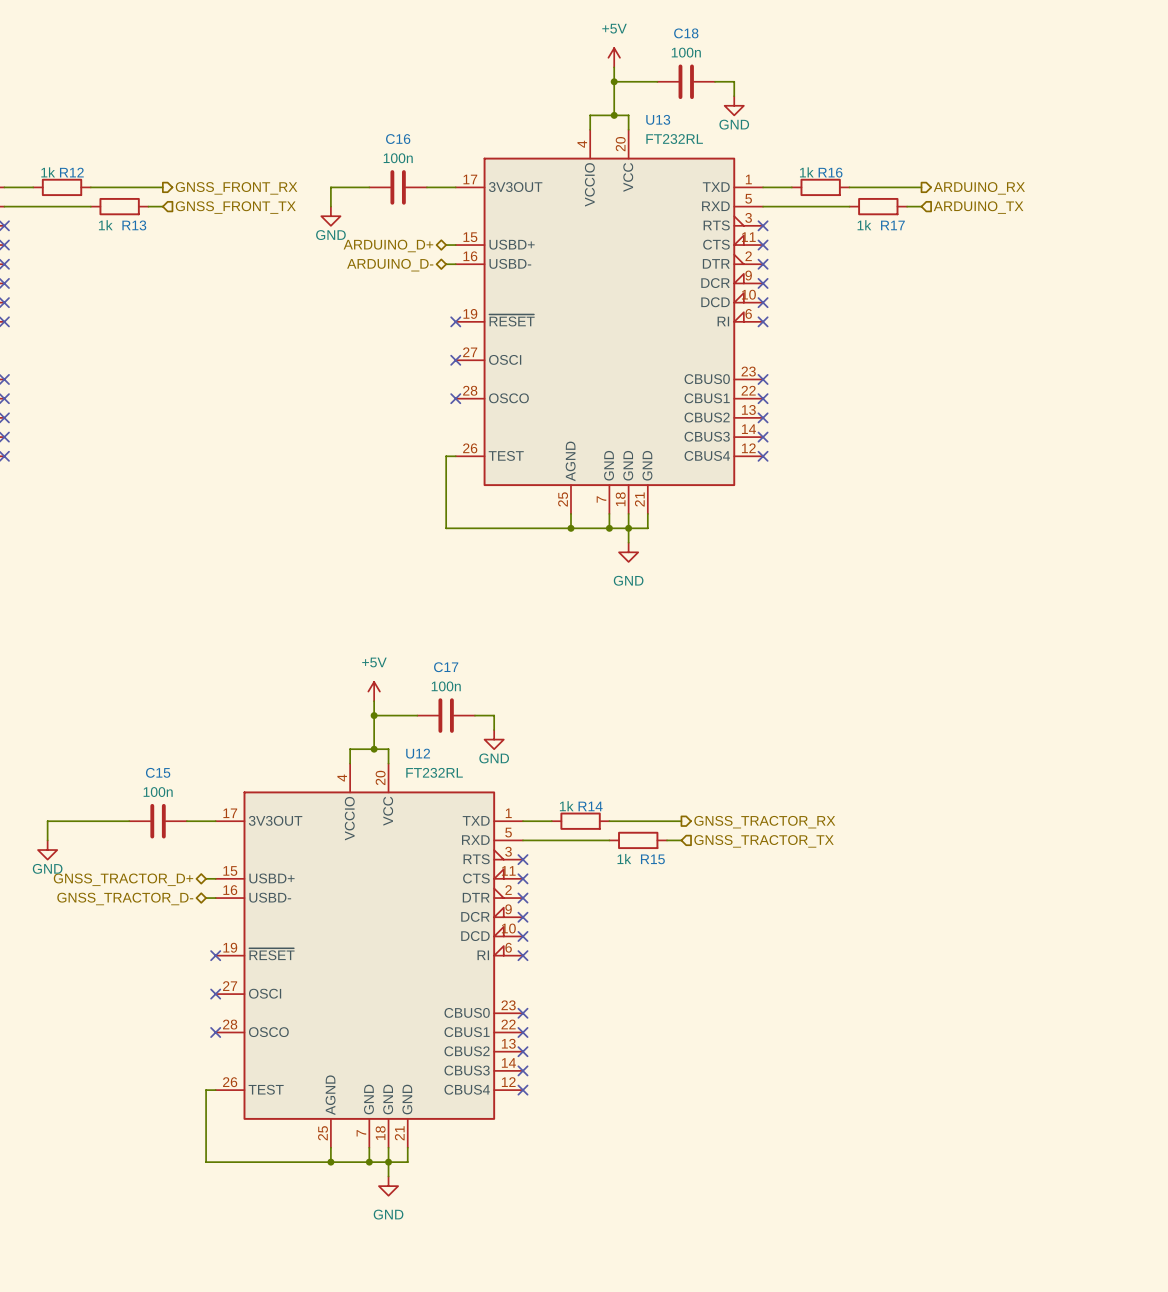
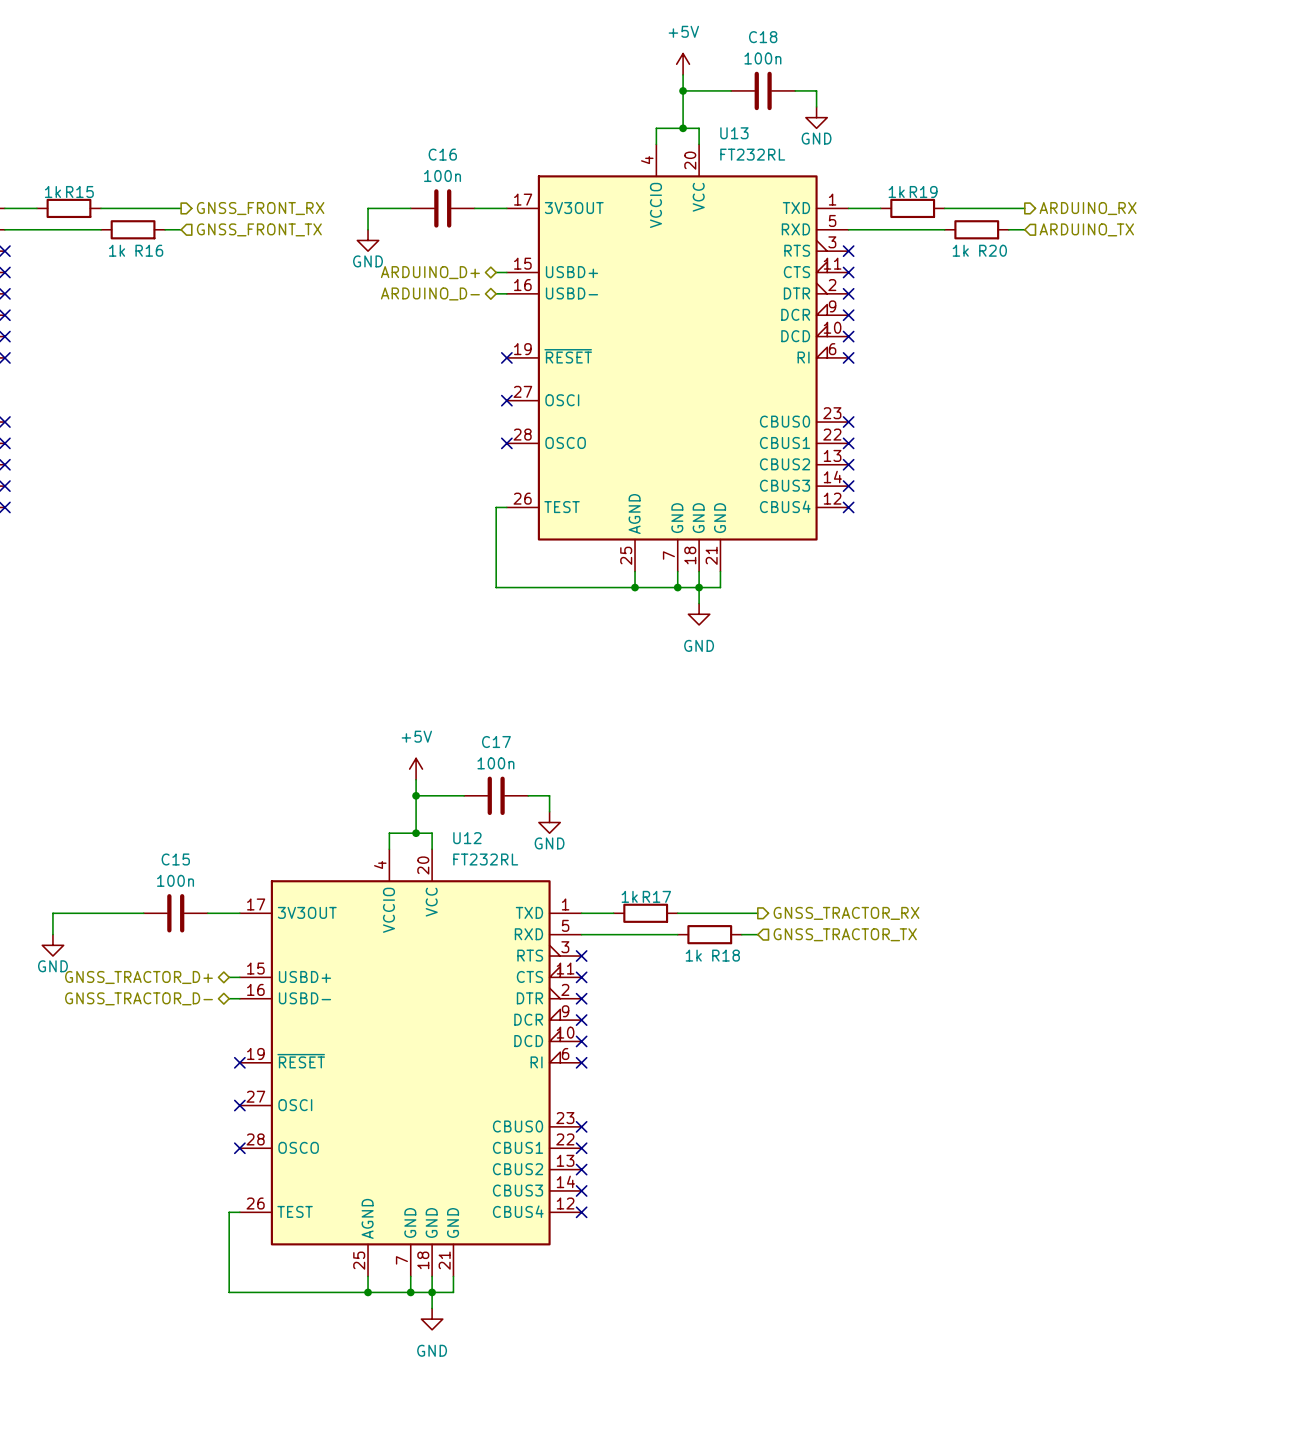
R12 name: R12 (71, 172) -> R15 (79, 192)
R16 name: R16 (830, 172) -> R19 (923, 192)
R13 name: R13 (134, 225) -> R16 (149, 250)
R17 name: R17 (892, 225) -> R20 (993, 250)
R14 name: R14 (590, 806) -> R17 (656, 896)
R15 name: R15 (652, 859) -> R18 (726, 955)

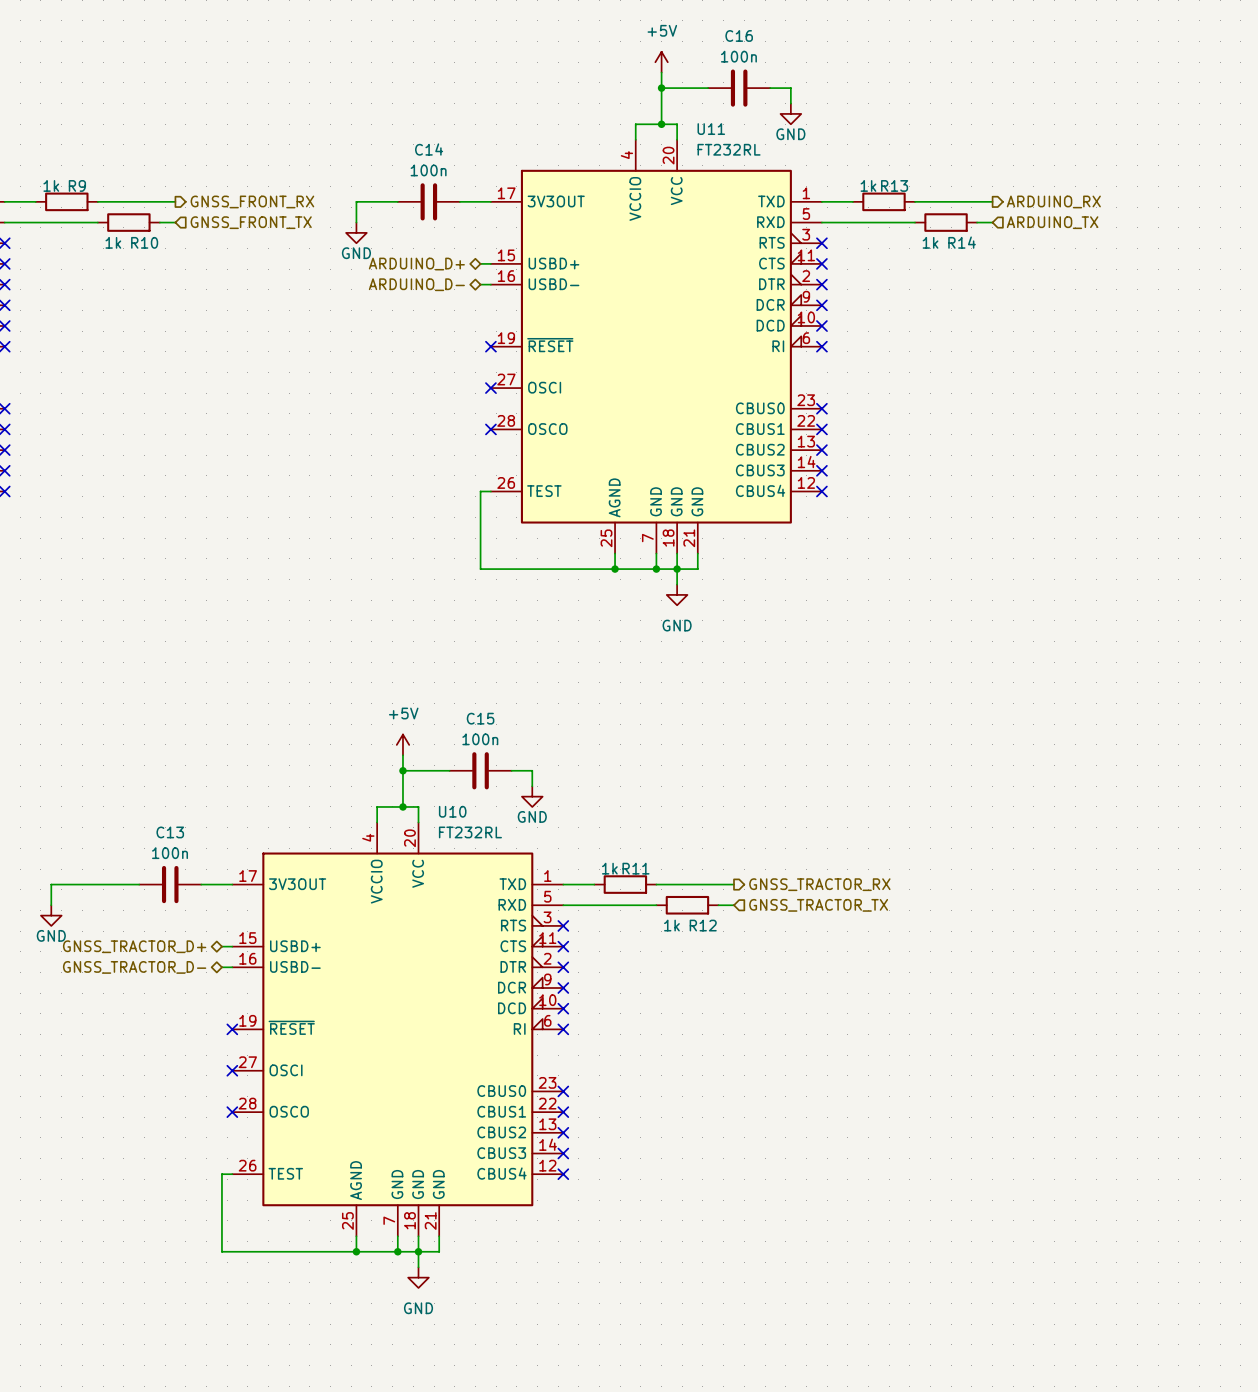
C18 name: C18 (763, 37) -> C16 (739, 35)
U13 name: U13 (734, 133) -> U11 (711, 129)
C16 name: C16 (442, 154) -> C14 (429, 149)
R15 name: R15 (79, 192) -> R9 (77, 185)
R19 name: R19 (923, 192) -> R13 (894, 185)
R16 name: R16 (149, 250) -> R10 (144, 242)
R20 name: R20 (993, 250) -> R14 (962, 242)
C17 name: C17 (496, 742) -> C15 (480, 718)
U12 name: U12 (467, 838) -> U10 (452, 811)
C15 name: C15 (175, 859) -> C13 (170, 832)
R17 name: R17 (656, 896) -> R11 (635, 868)
R18 name: R18 (726, 955) -> R12 (703, 925)

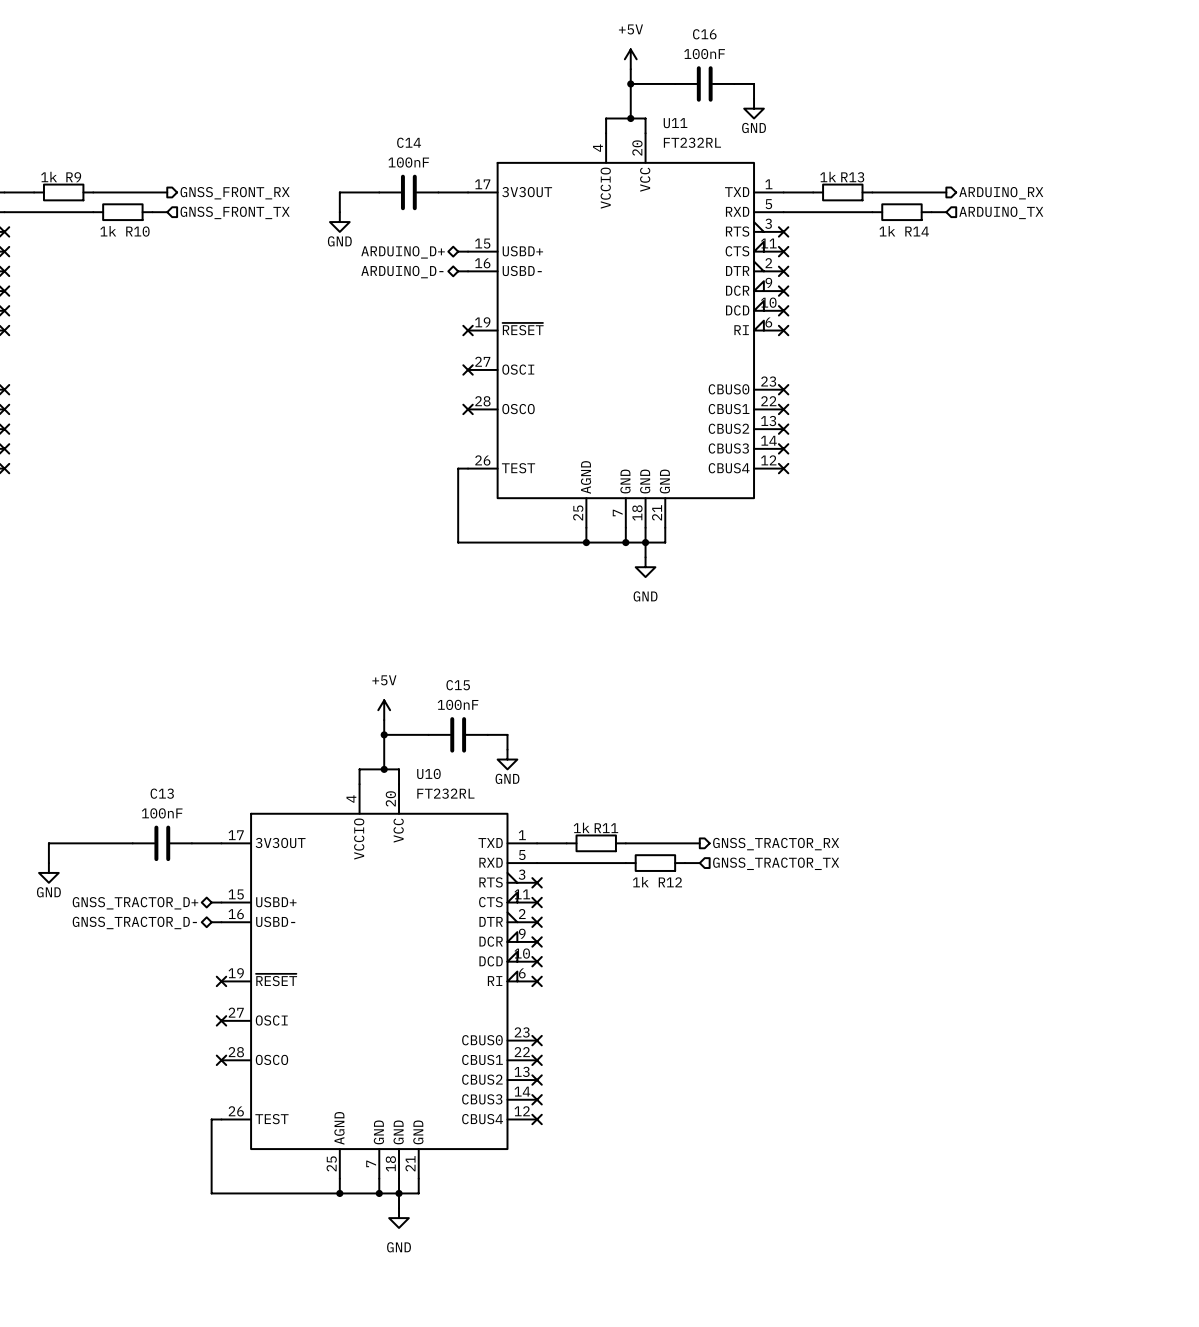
C16 value: 100n (738, 56) -> 100nF (704, 54)
C14 value: 100n (428, 170) -> 100nF (408, 162)
C15 value: 100n (480, 739) -> 100nF (458, 704)
C13 value: 100n (170, 853) -> 100nF (162, 813)

